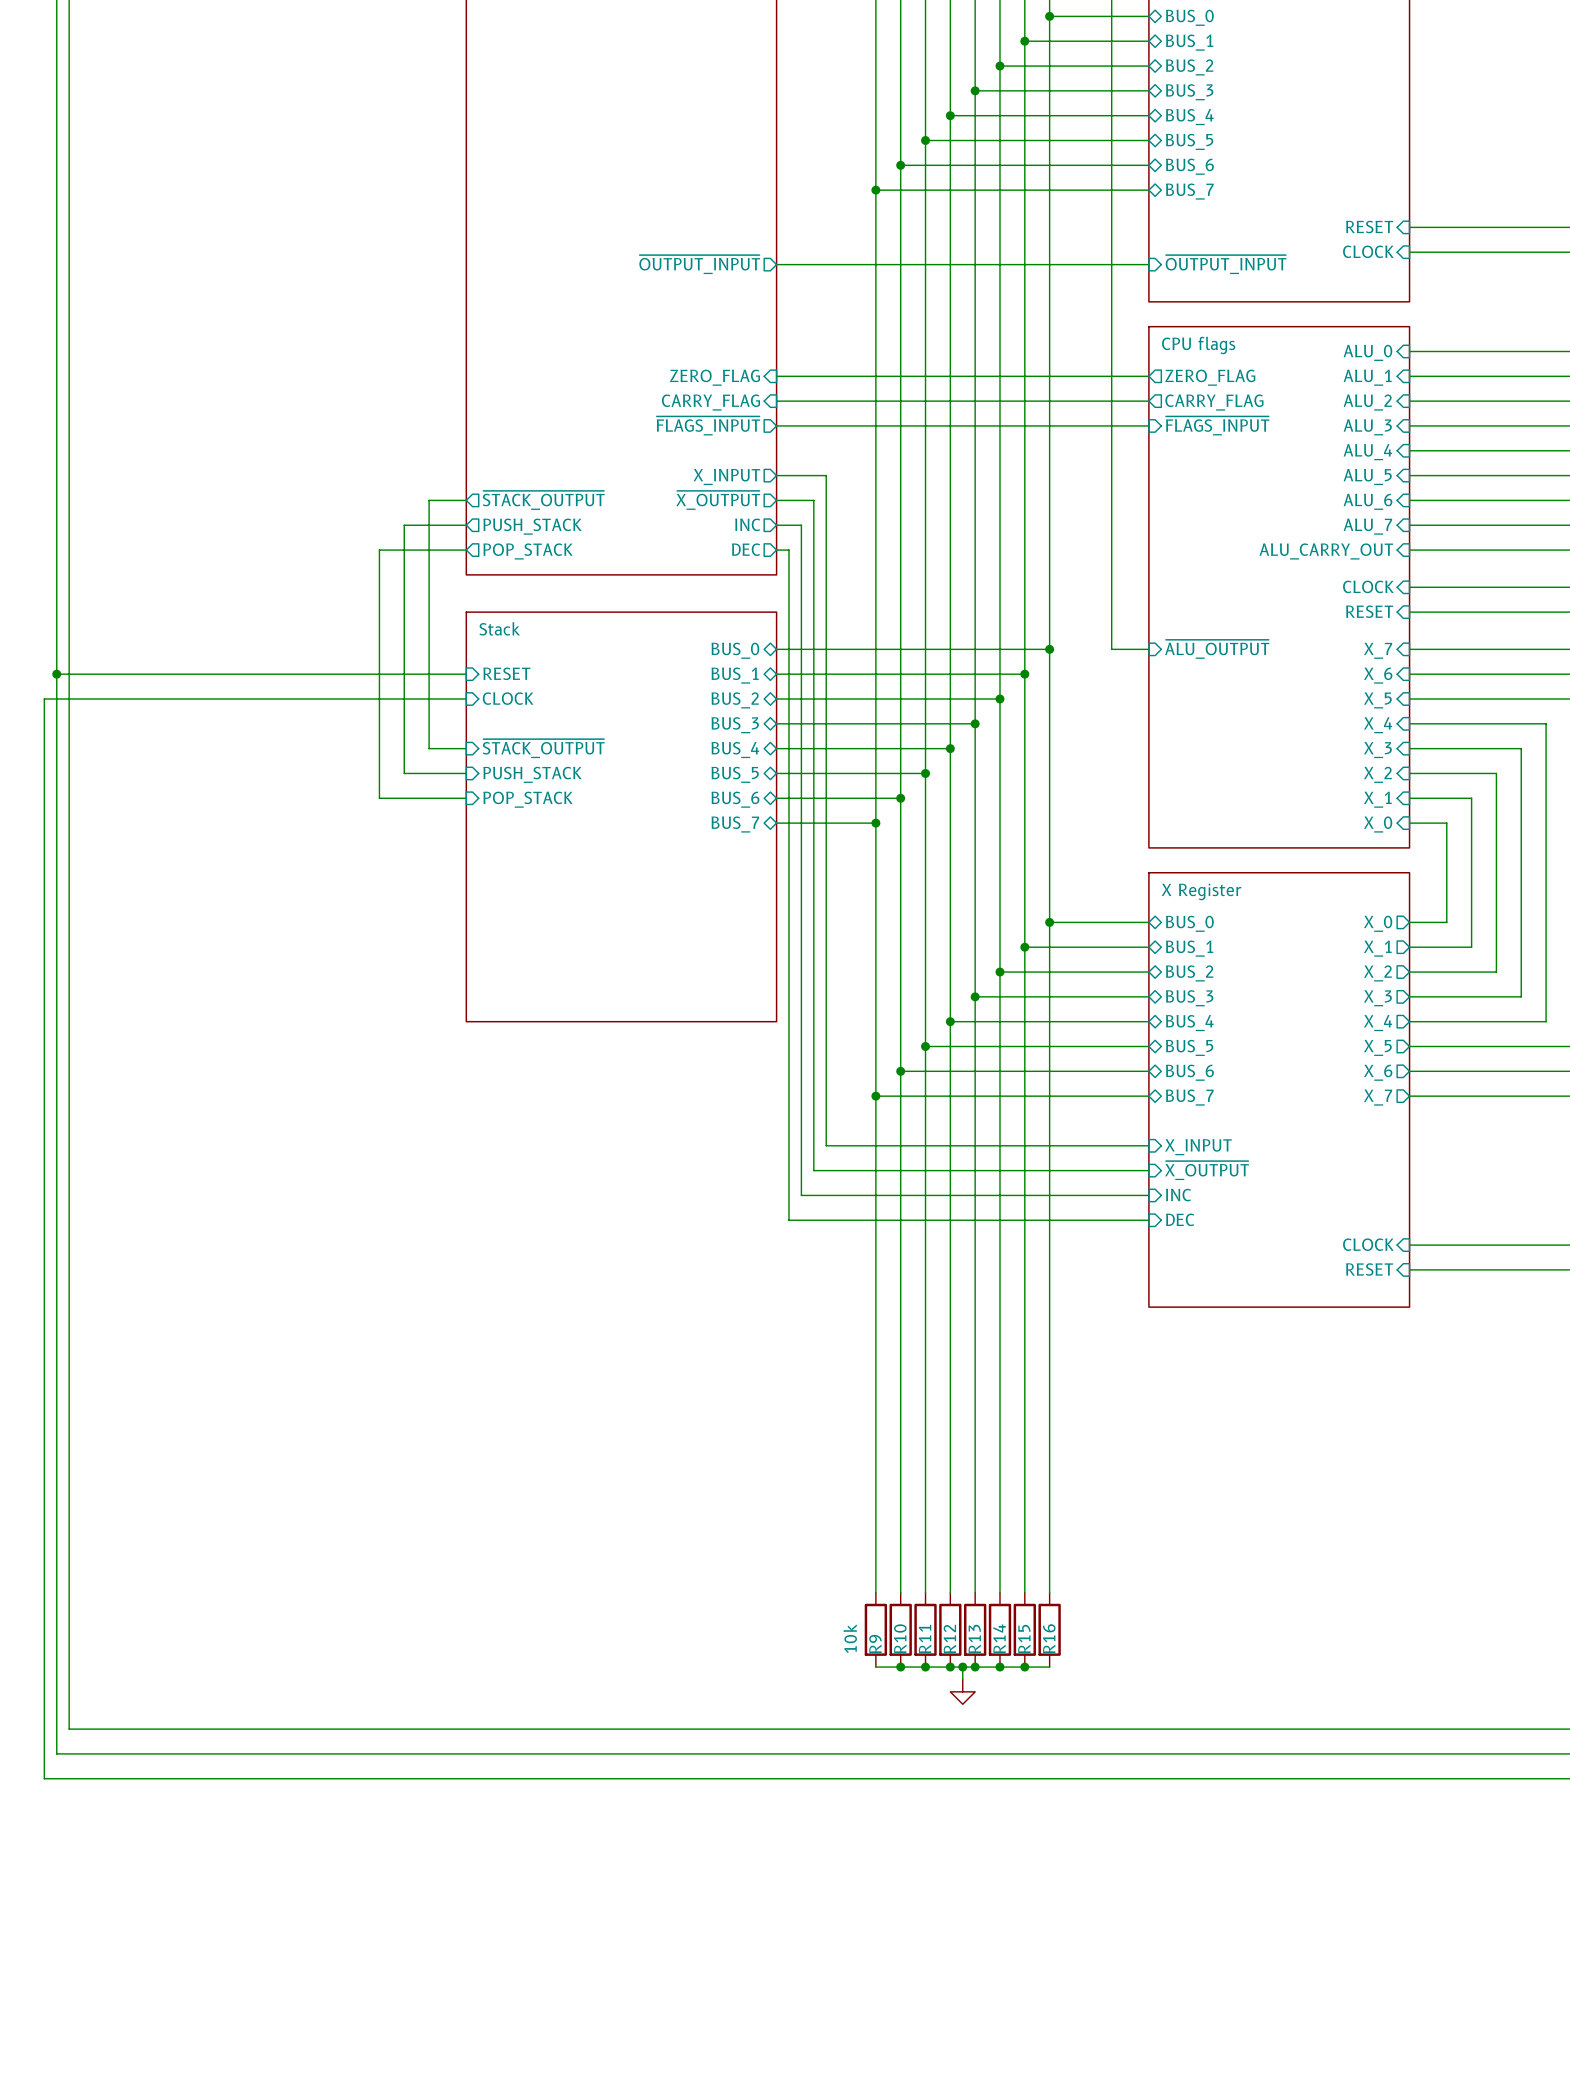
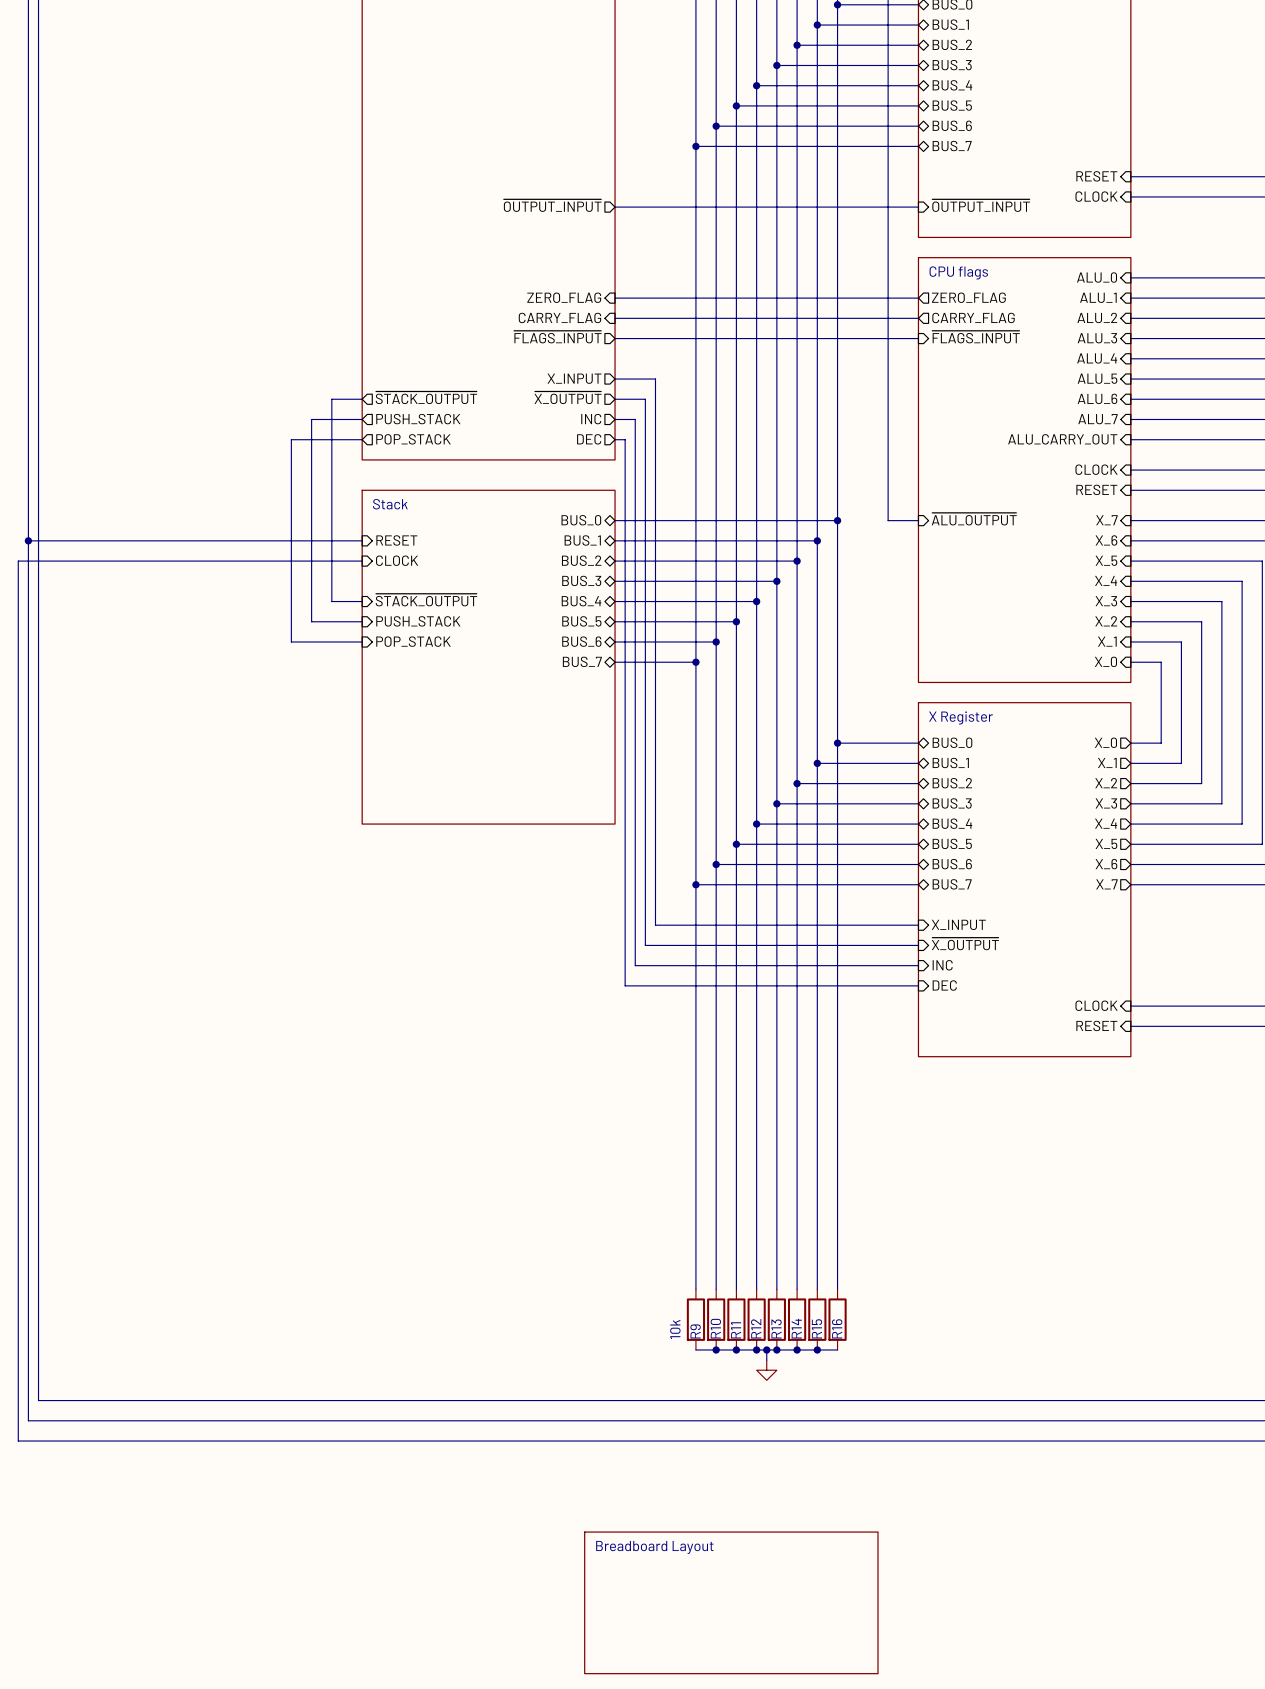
sheet Breadboard Layout: none -> (731, 1602)

